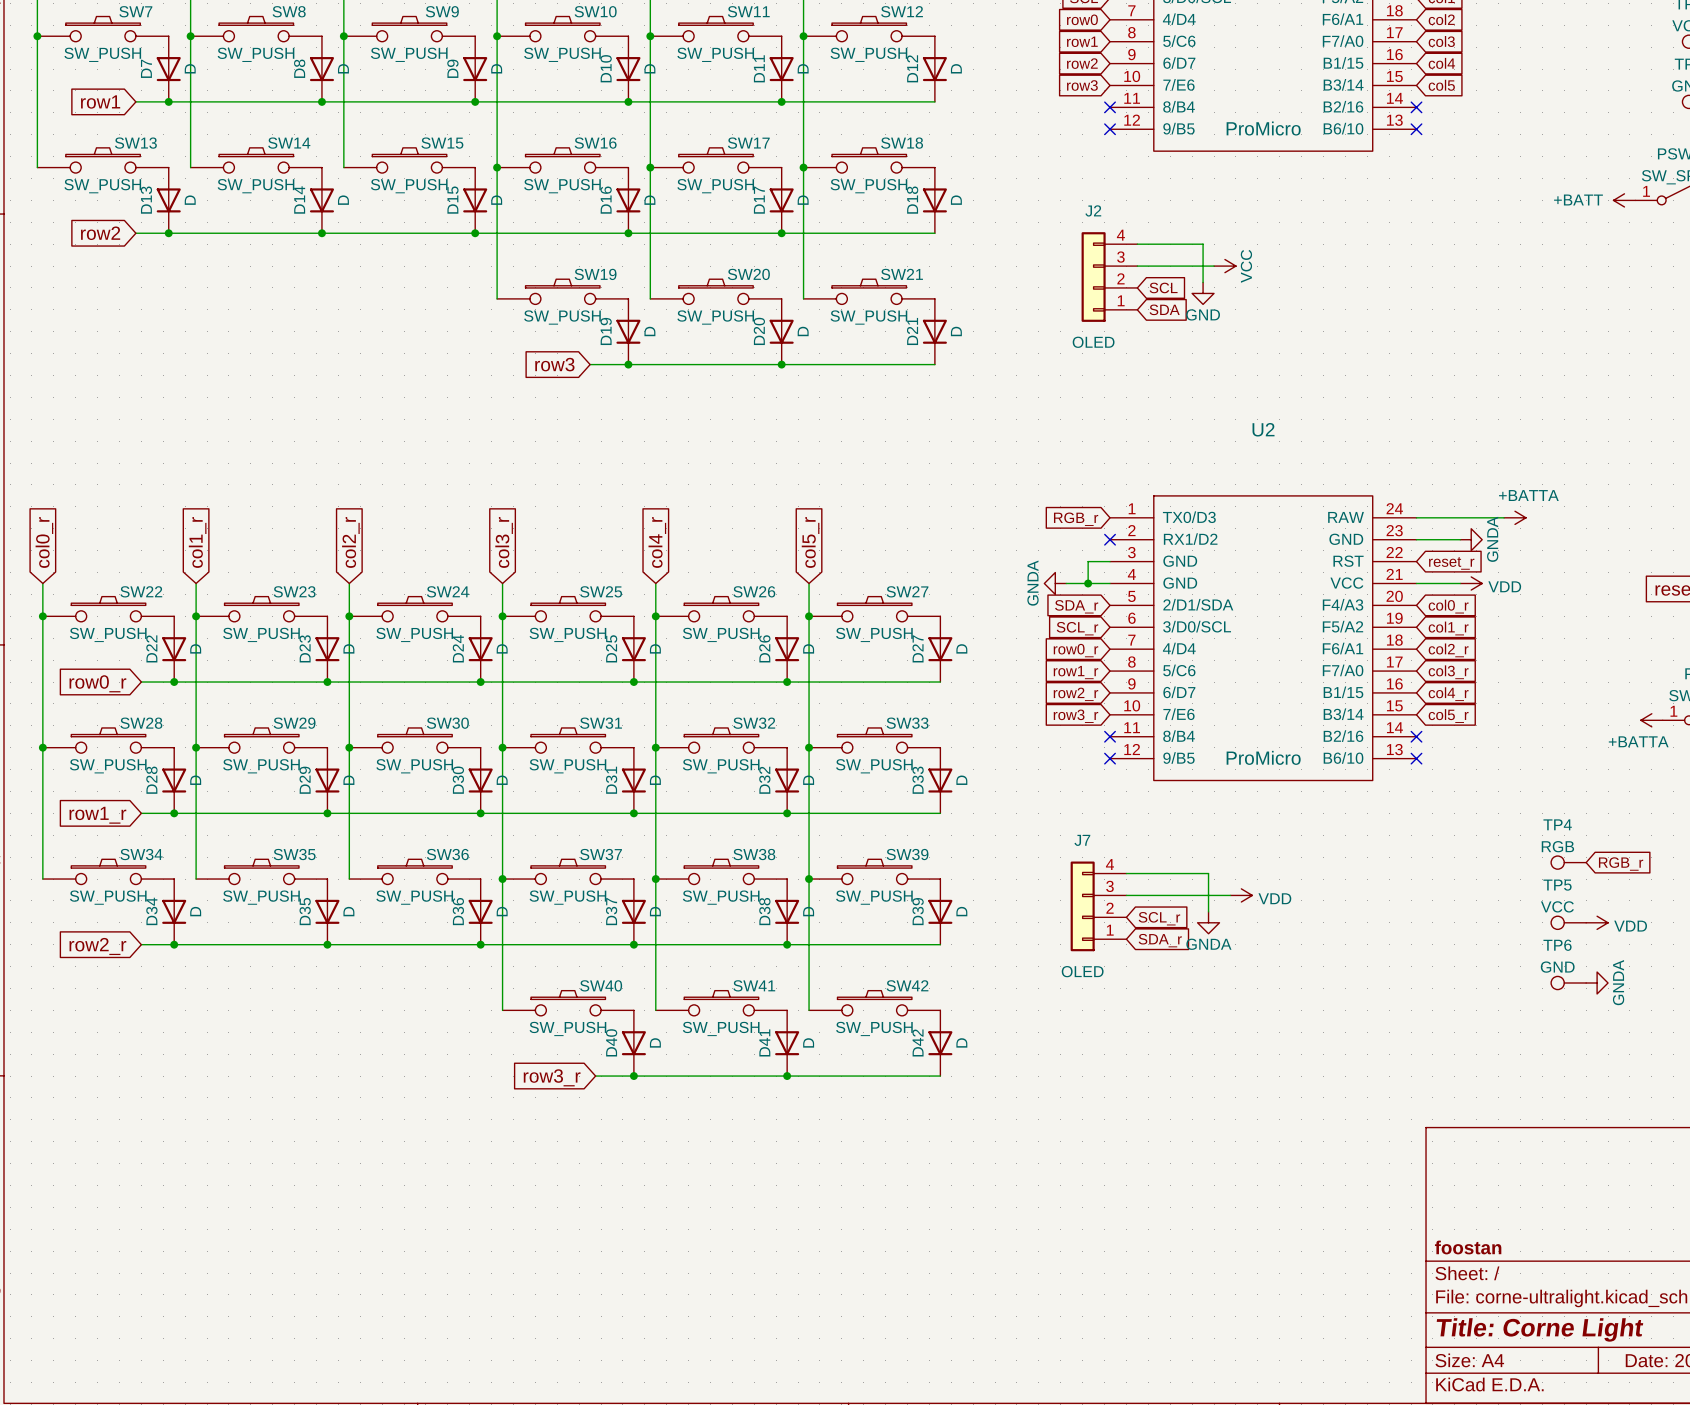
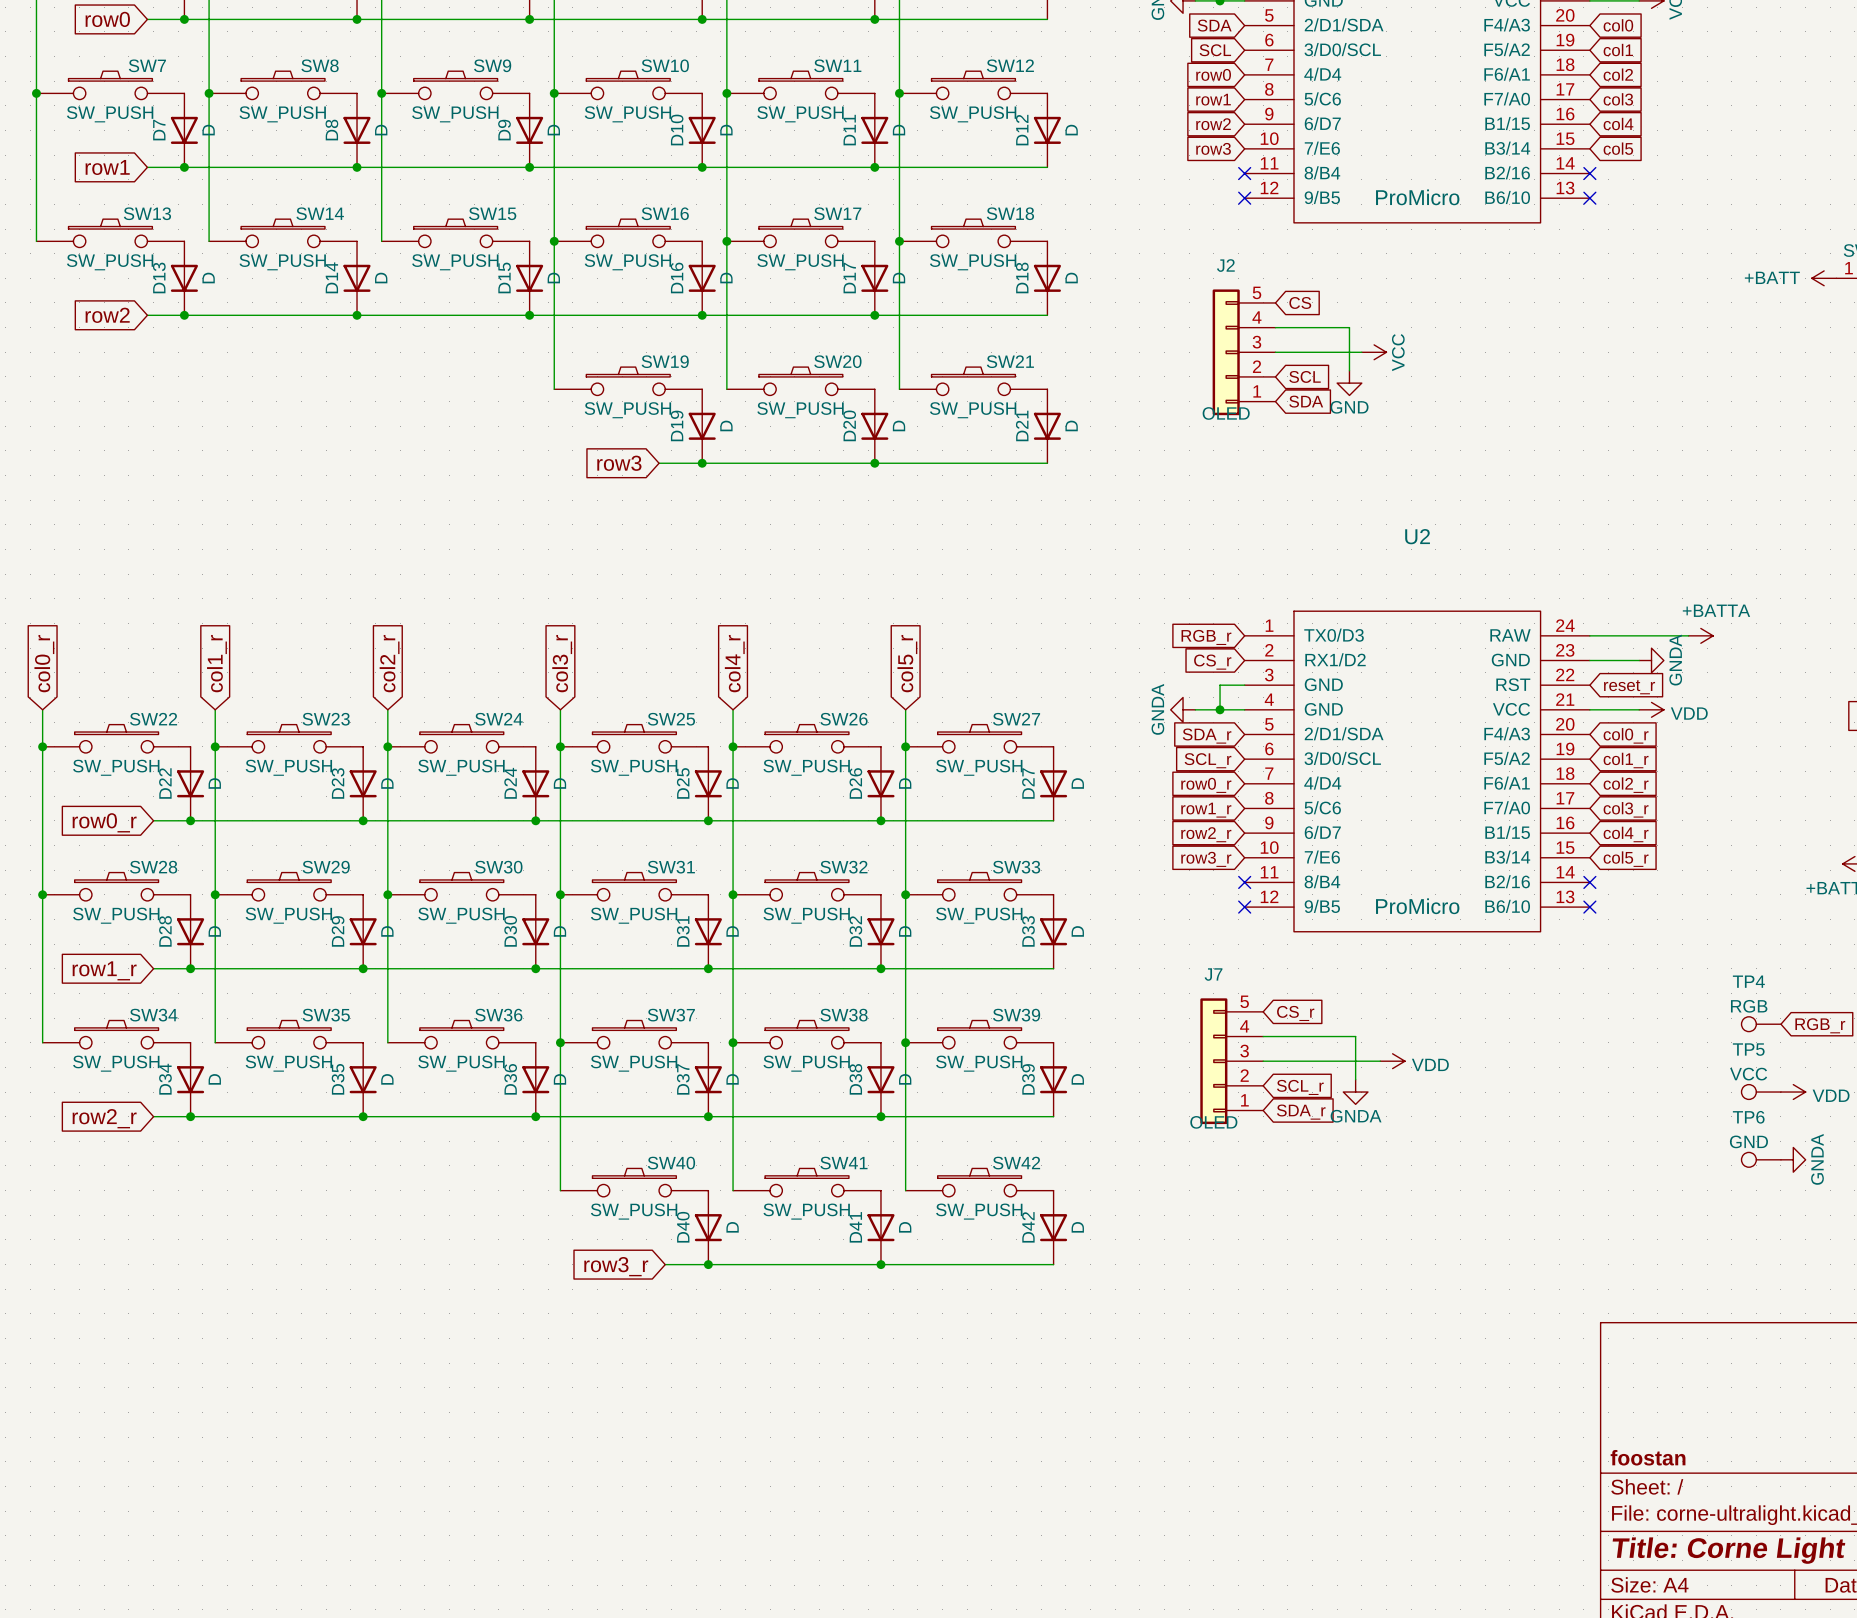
global label: none -> CS (1300, 302)
J2 symbol: [1081, 232, 1138, 322] -> [1212, 289, 1276, 416]
no-connect mark: (1110, 539) -> none
global label: none -> CS_r (1212, 662)
global label: none -> CS_r (1295, 1013)
J7 symbol: [1070, 861, 1127, 952] -> [1200, 998, 1264, 1125]

